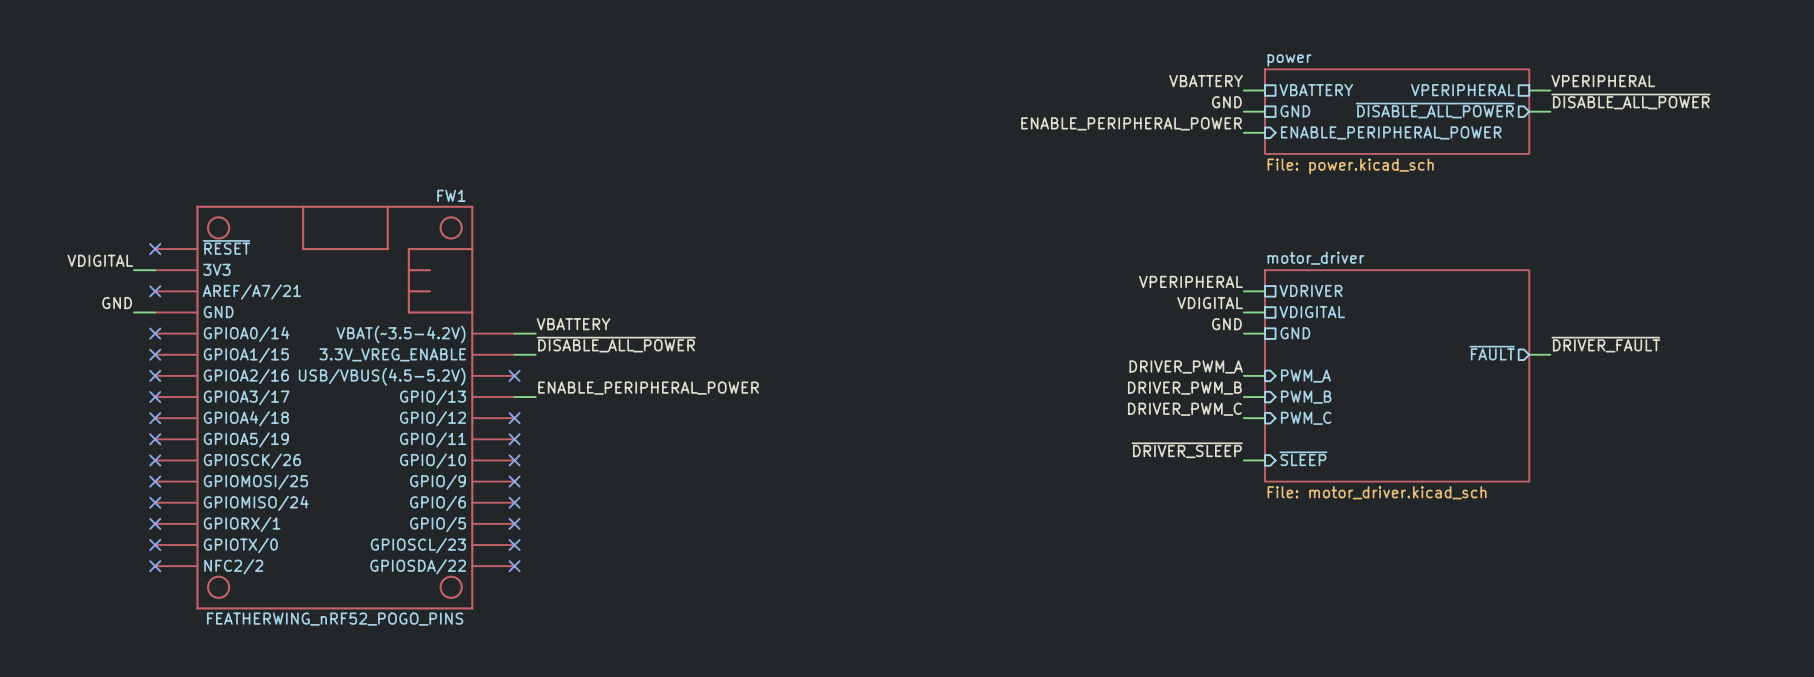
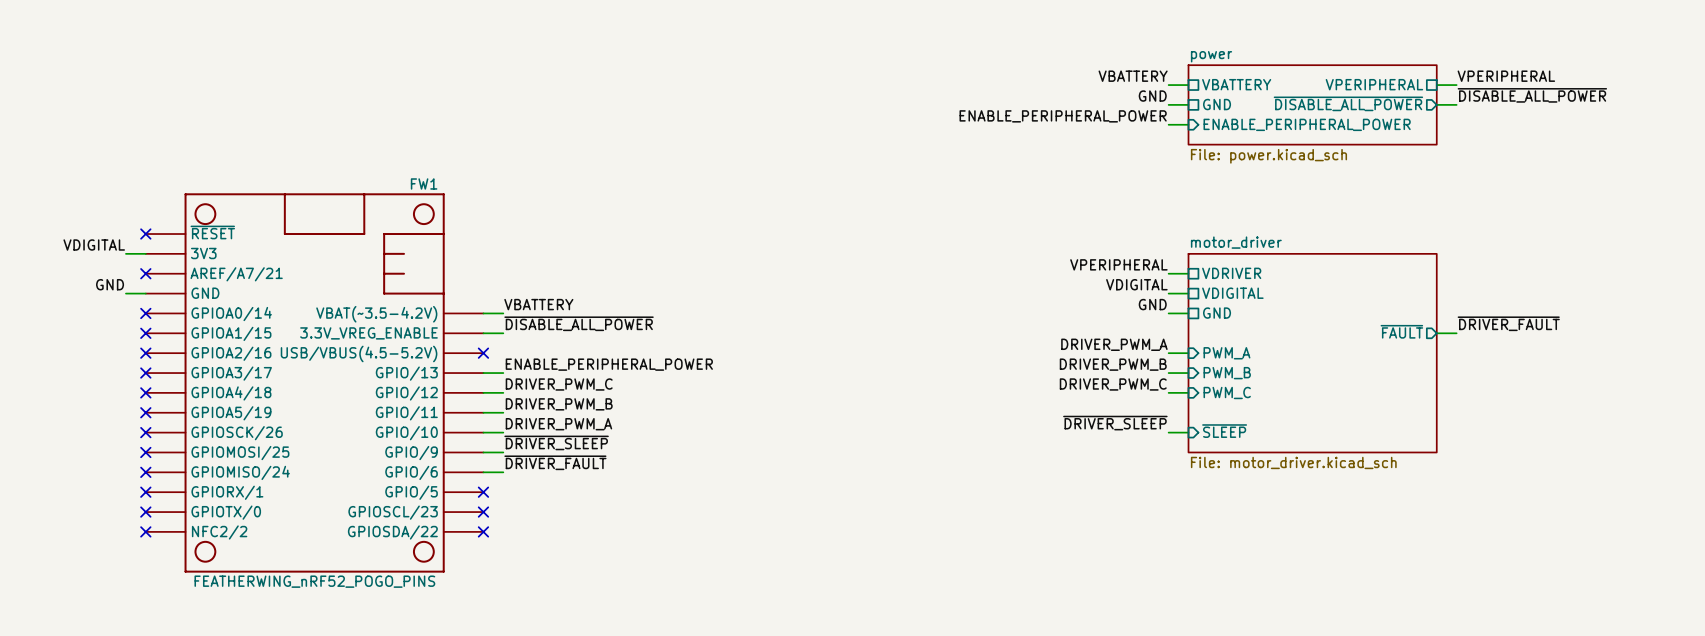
label: none -> DRIVER_PWM_C (559, 384)
wire: none -> (483, 392) (503, 392)
no-connect mark: (514, 418) -> none
label: none -> DRIVER_PWM_B (559, 404)
wire: none -> (483, 412) (503, 412)
no-connect mark: (514, 439) -> none
label: none -> DRIVER_PWM_A (558, 424)
wire: none -> (483, 432) (503, 432)
no-connect mark: (514, 460) -> none
label: none -> ~{DRIVER_SLEEP} (556, 442)
wire: none -> (483, 452) (503, 452)
no-connect mark: (514, 481) -> none
label: none -> ~{DRIVER_FAULT} (555, 462)
wire: none -> (483, 472) (503, 472)
no-connect mark: (514, 502) -> none

